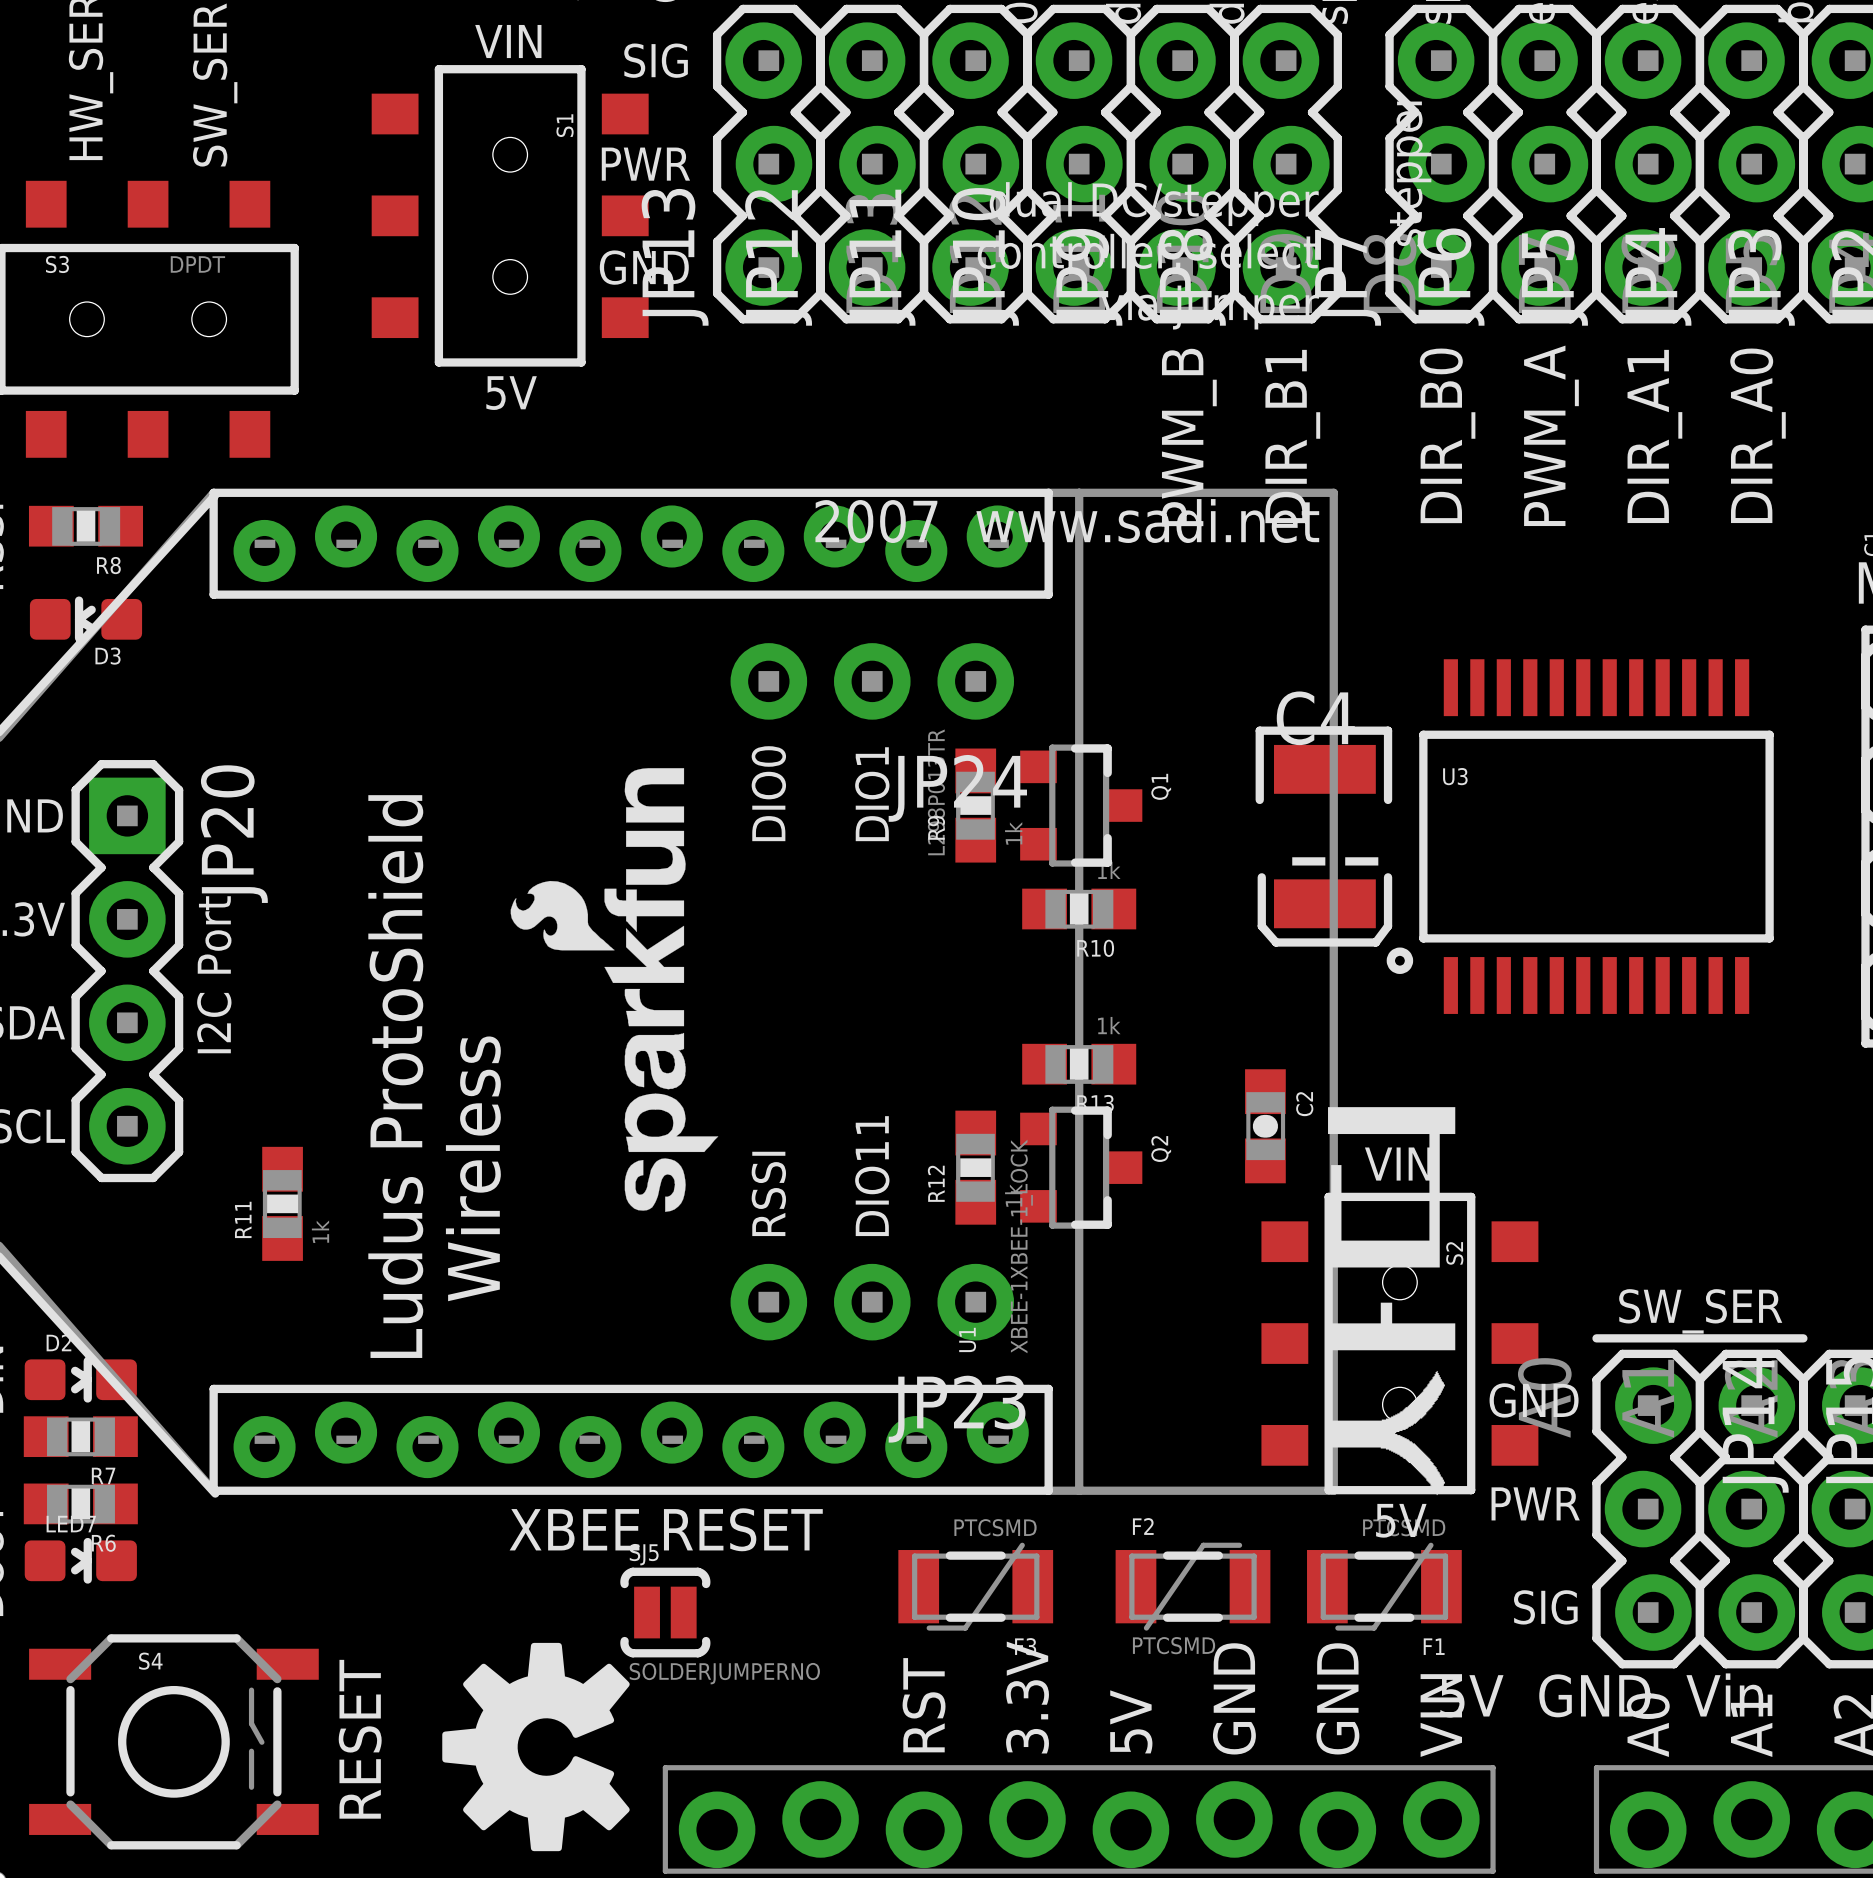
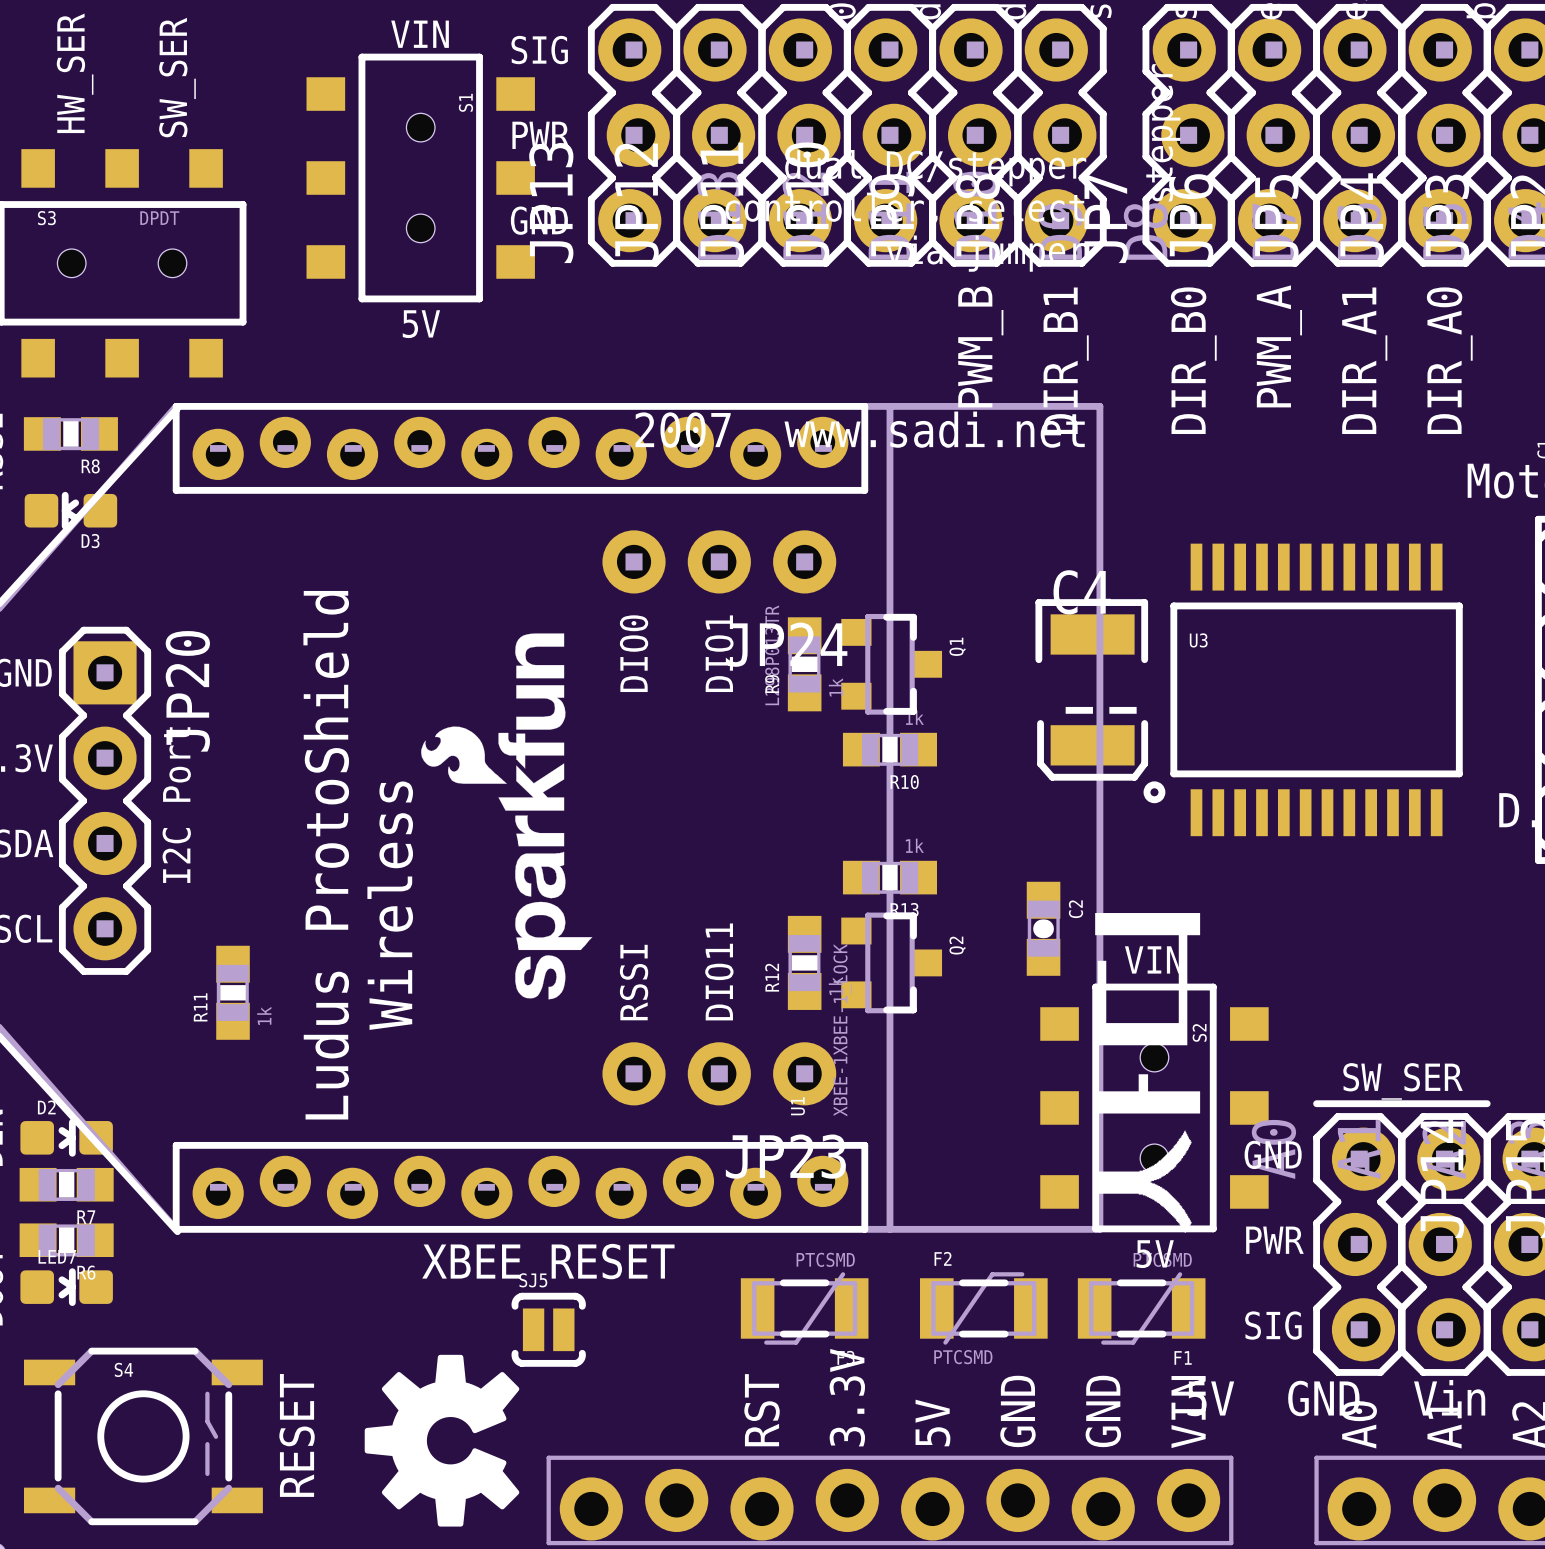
SJ5 value: SOLDERJUMPERNO (724, 1673) -> none

